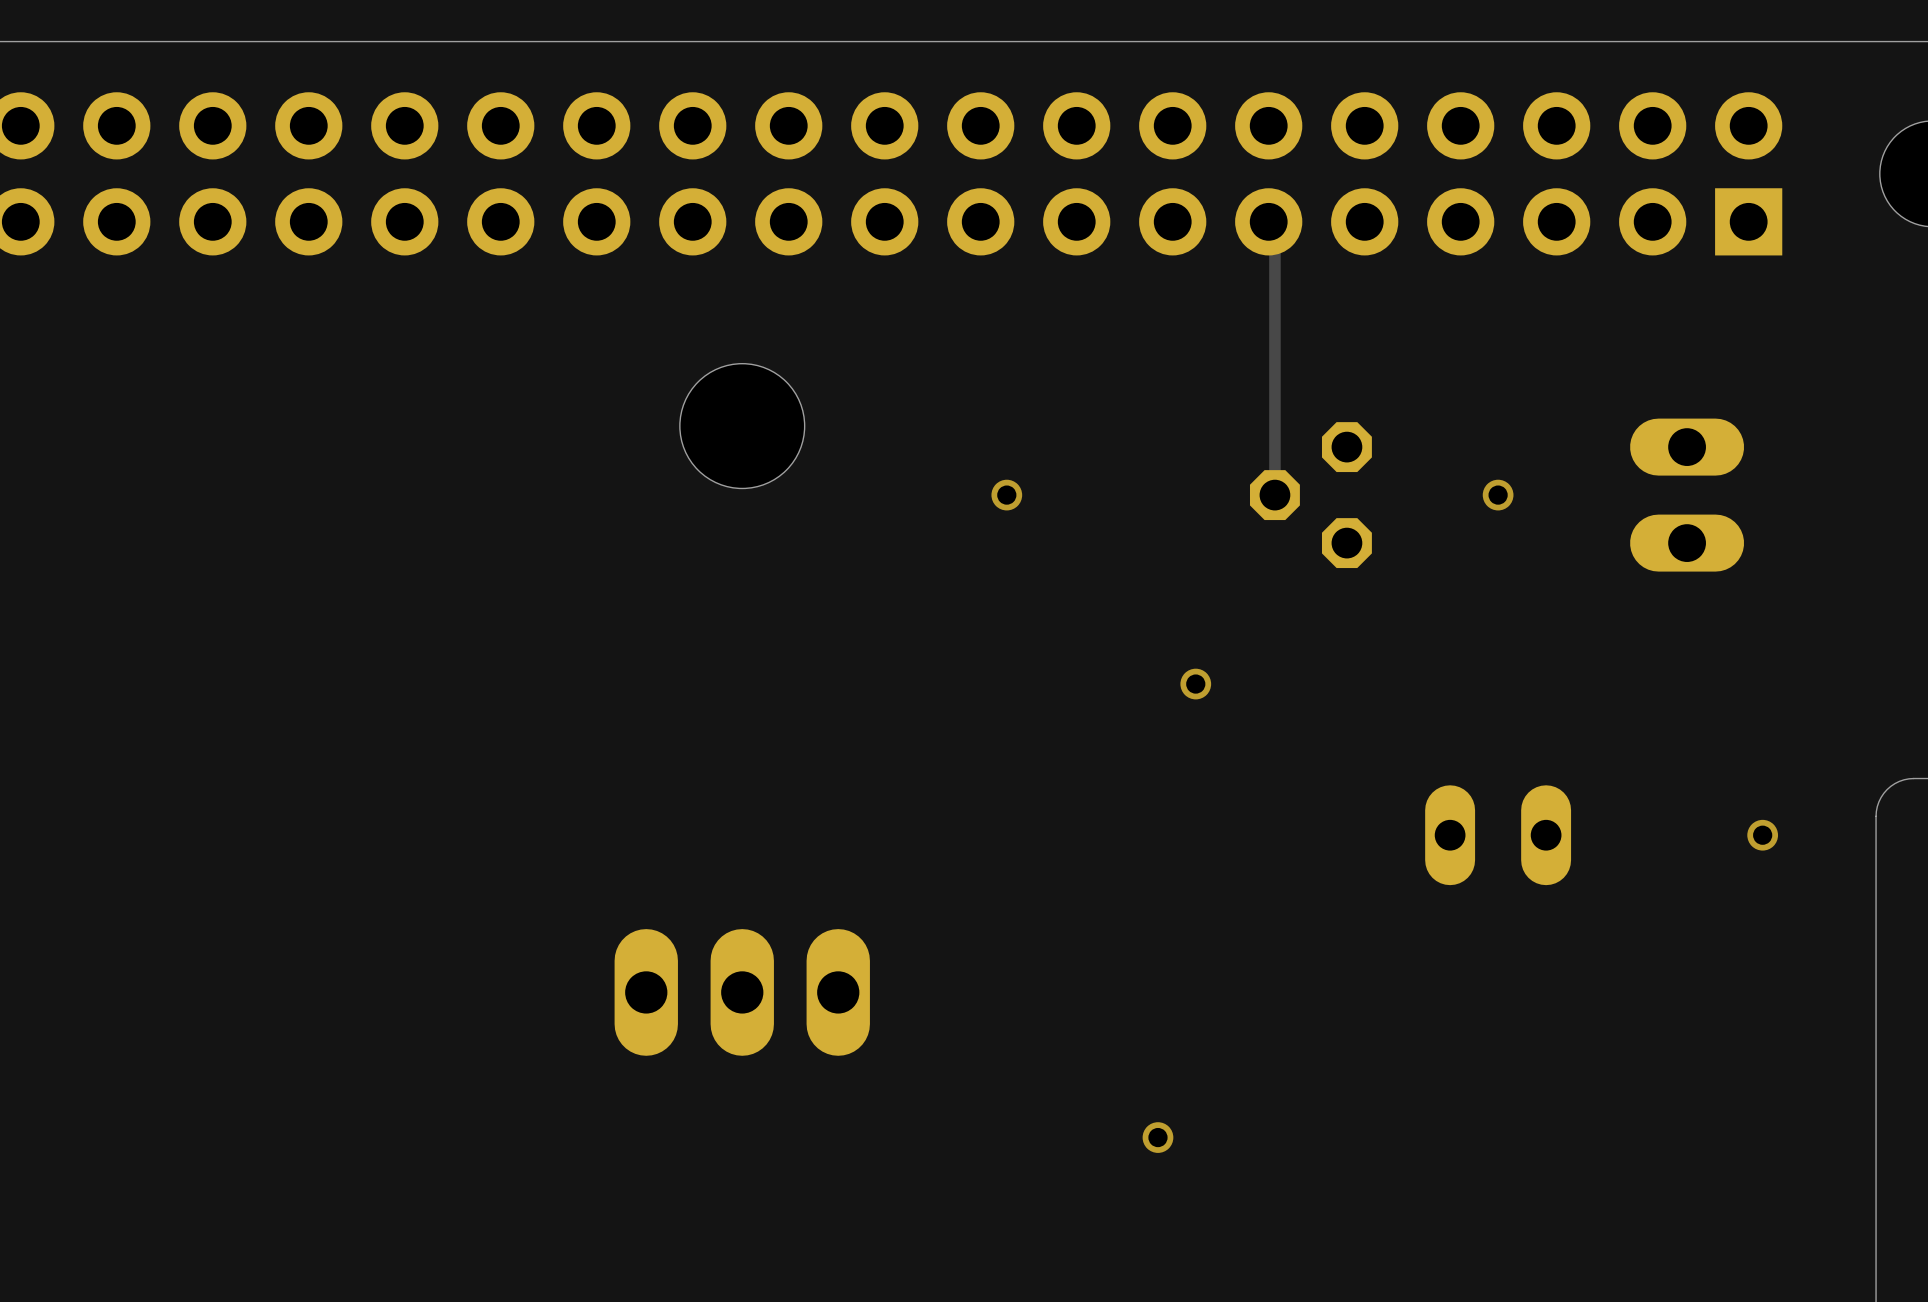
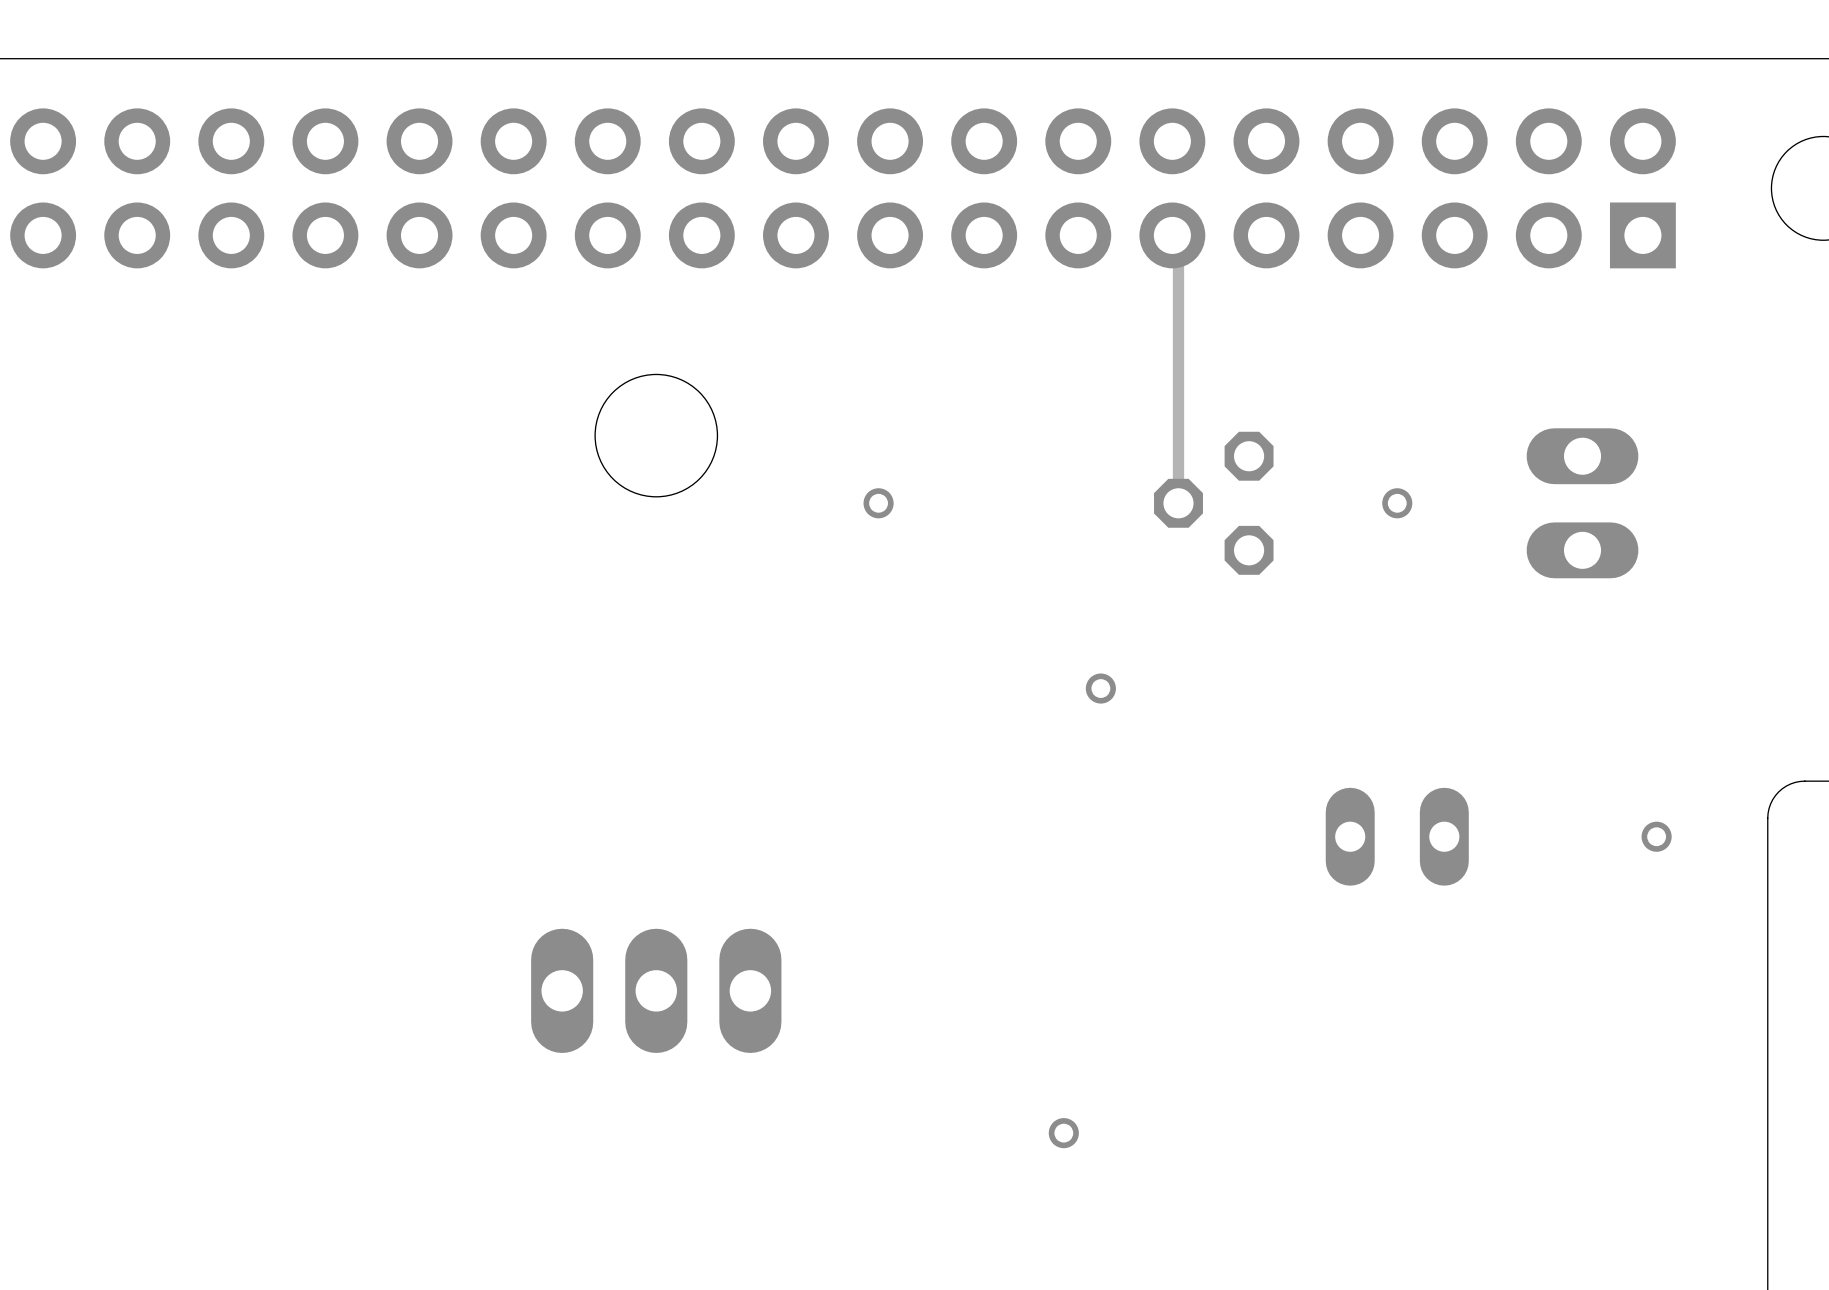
via position: (1006, 495) -> (878, 503)

